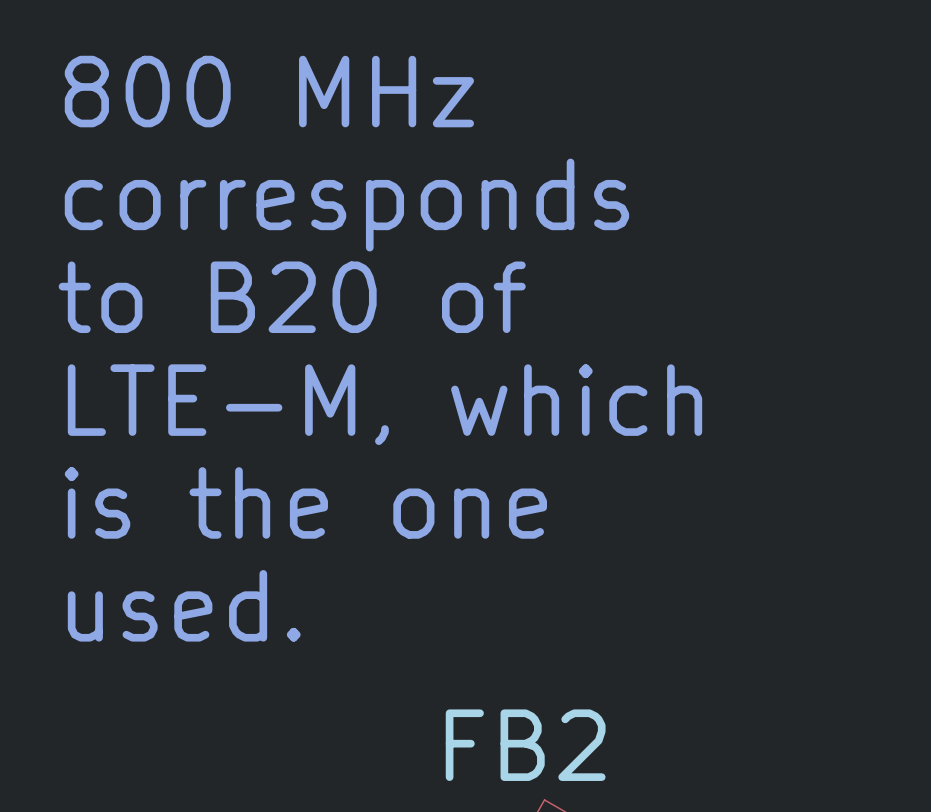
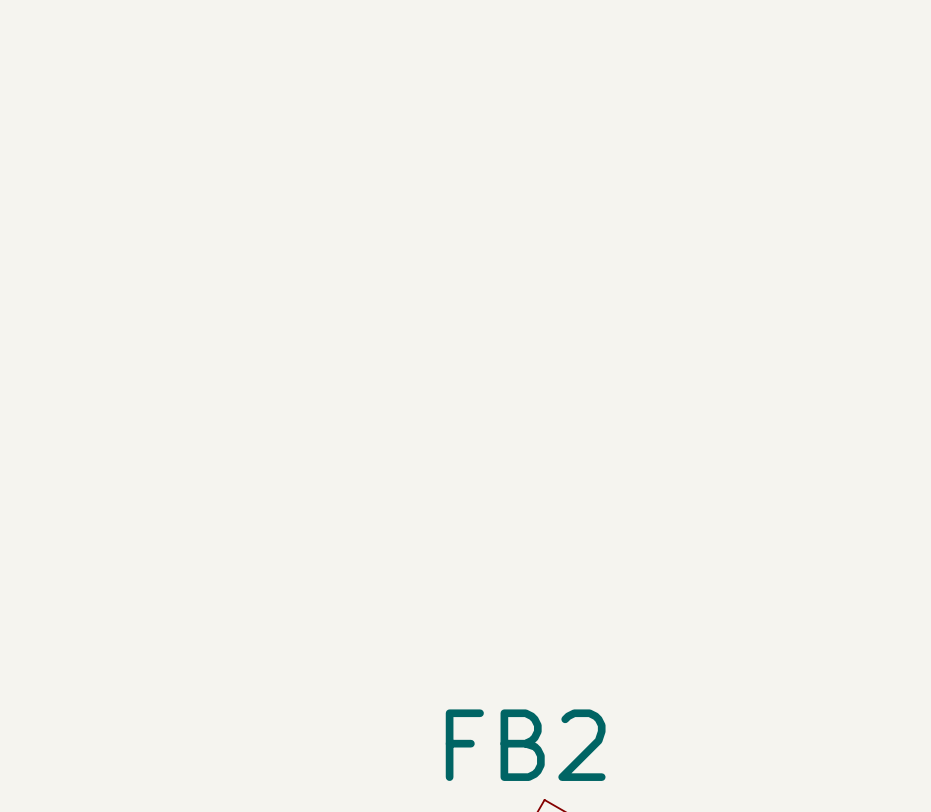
text: 800 MHz (269, 91) -> none
text: corresponds (346, 205) -> none
text: to B20 of (292, 297) -> none
text: LTE-M, which (384, 404) -> none
text: is the one (305, 502) -> none
text: used. (184, 605) -> none

